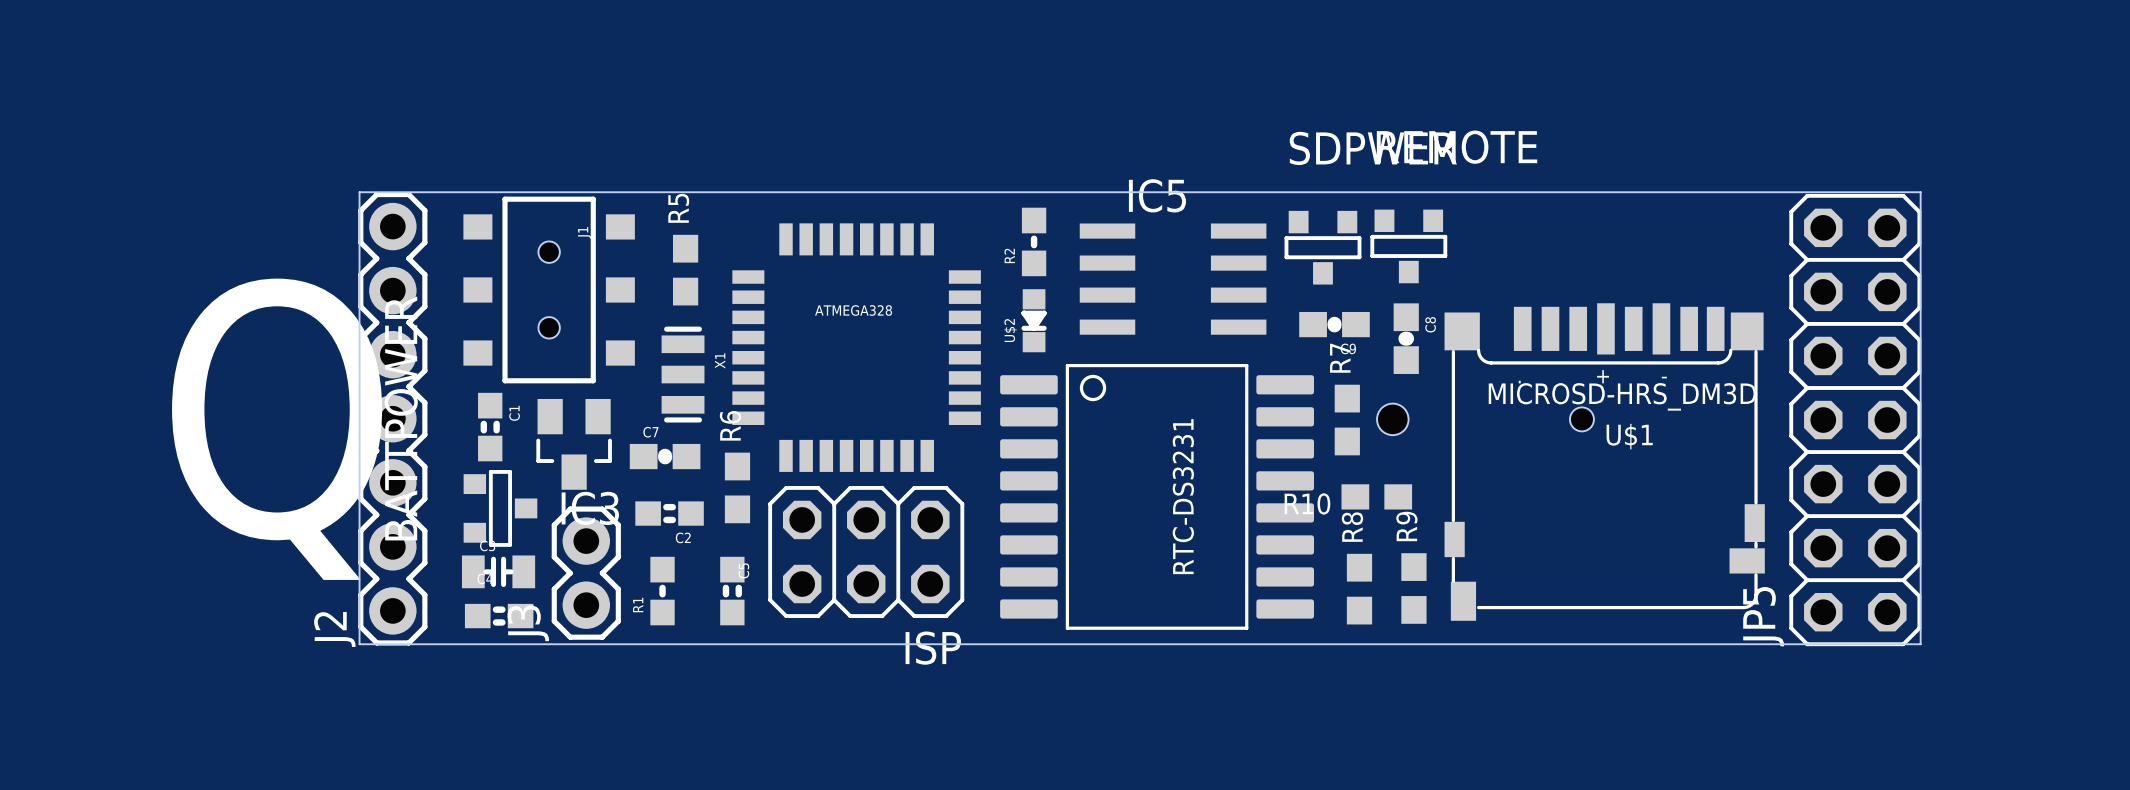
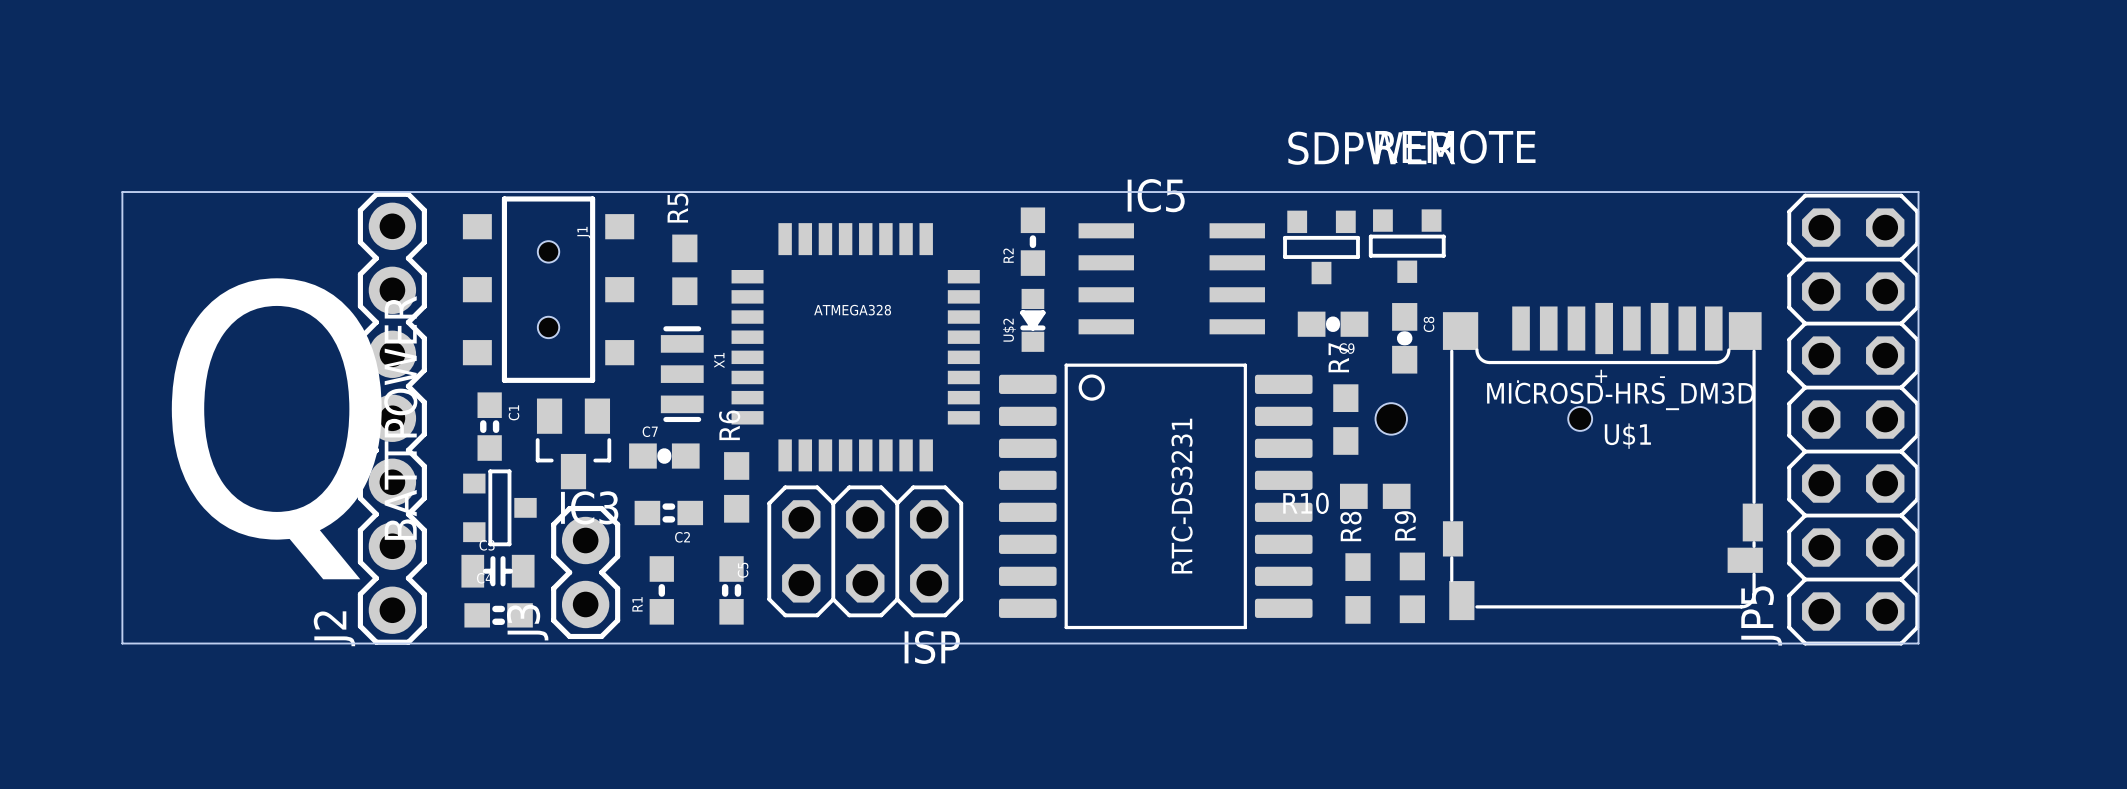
board edge: (359, 192) (359, 644) -> (359, 192) (122, 192) (122, 643) (359, 643)

